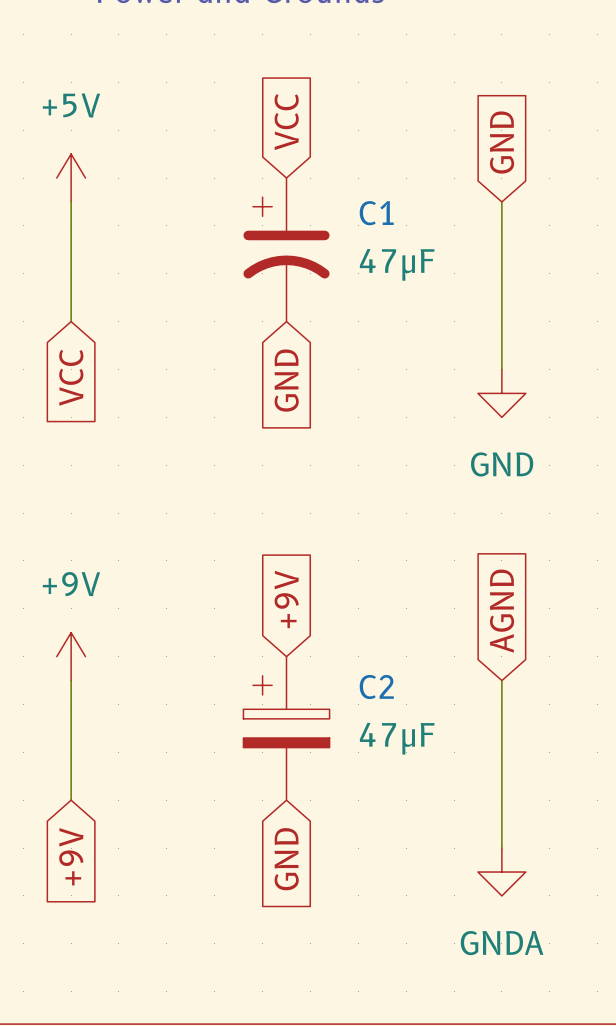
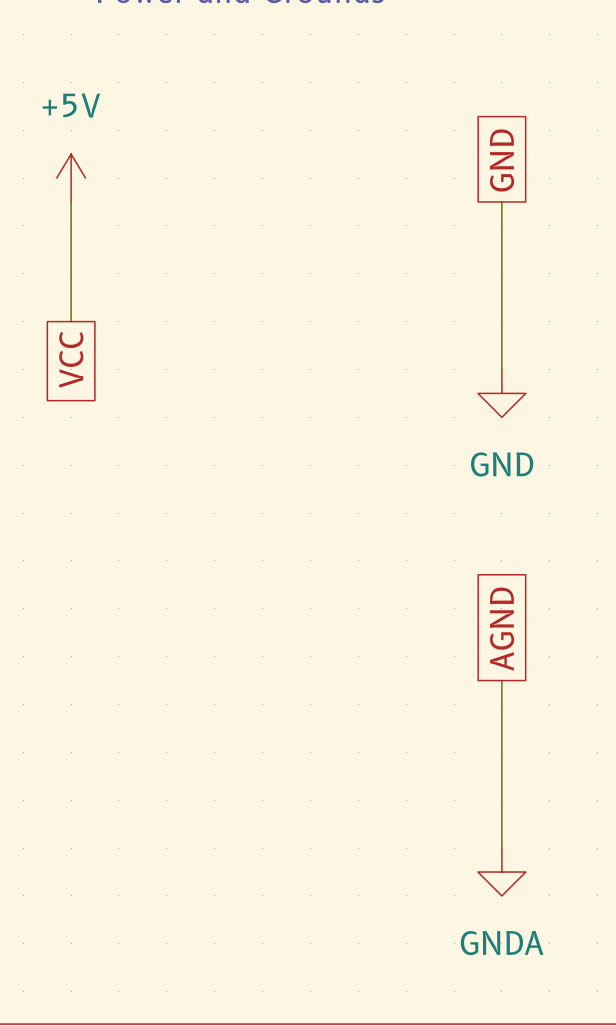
global label: VCC (286, 122) -> none
global label shape: input (502, 142) -> passive (502, 160)
C1: 47μF (286, 249) -> none
global label shape: input (71, 377) -> passive (71, 359)
global label: GND (286, 380) -> none
global label: +9V (286, 599) -> none
global label shape: input (502, 611) -> passive (502, 629)
power symbol: +9V (71, 656) -> none
wire: (71, 680) (71, 800) -> none
C2: 47μF (286, 728) -> none
global label: +9V (71, 856) -> none
global label: GND (286, 859) -> none

